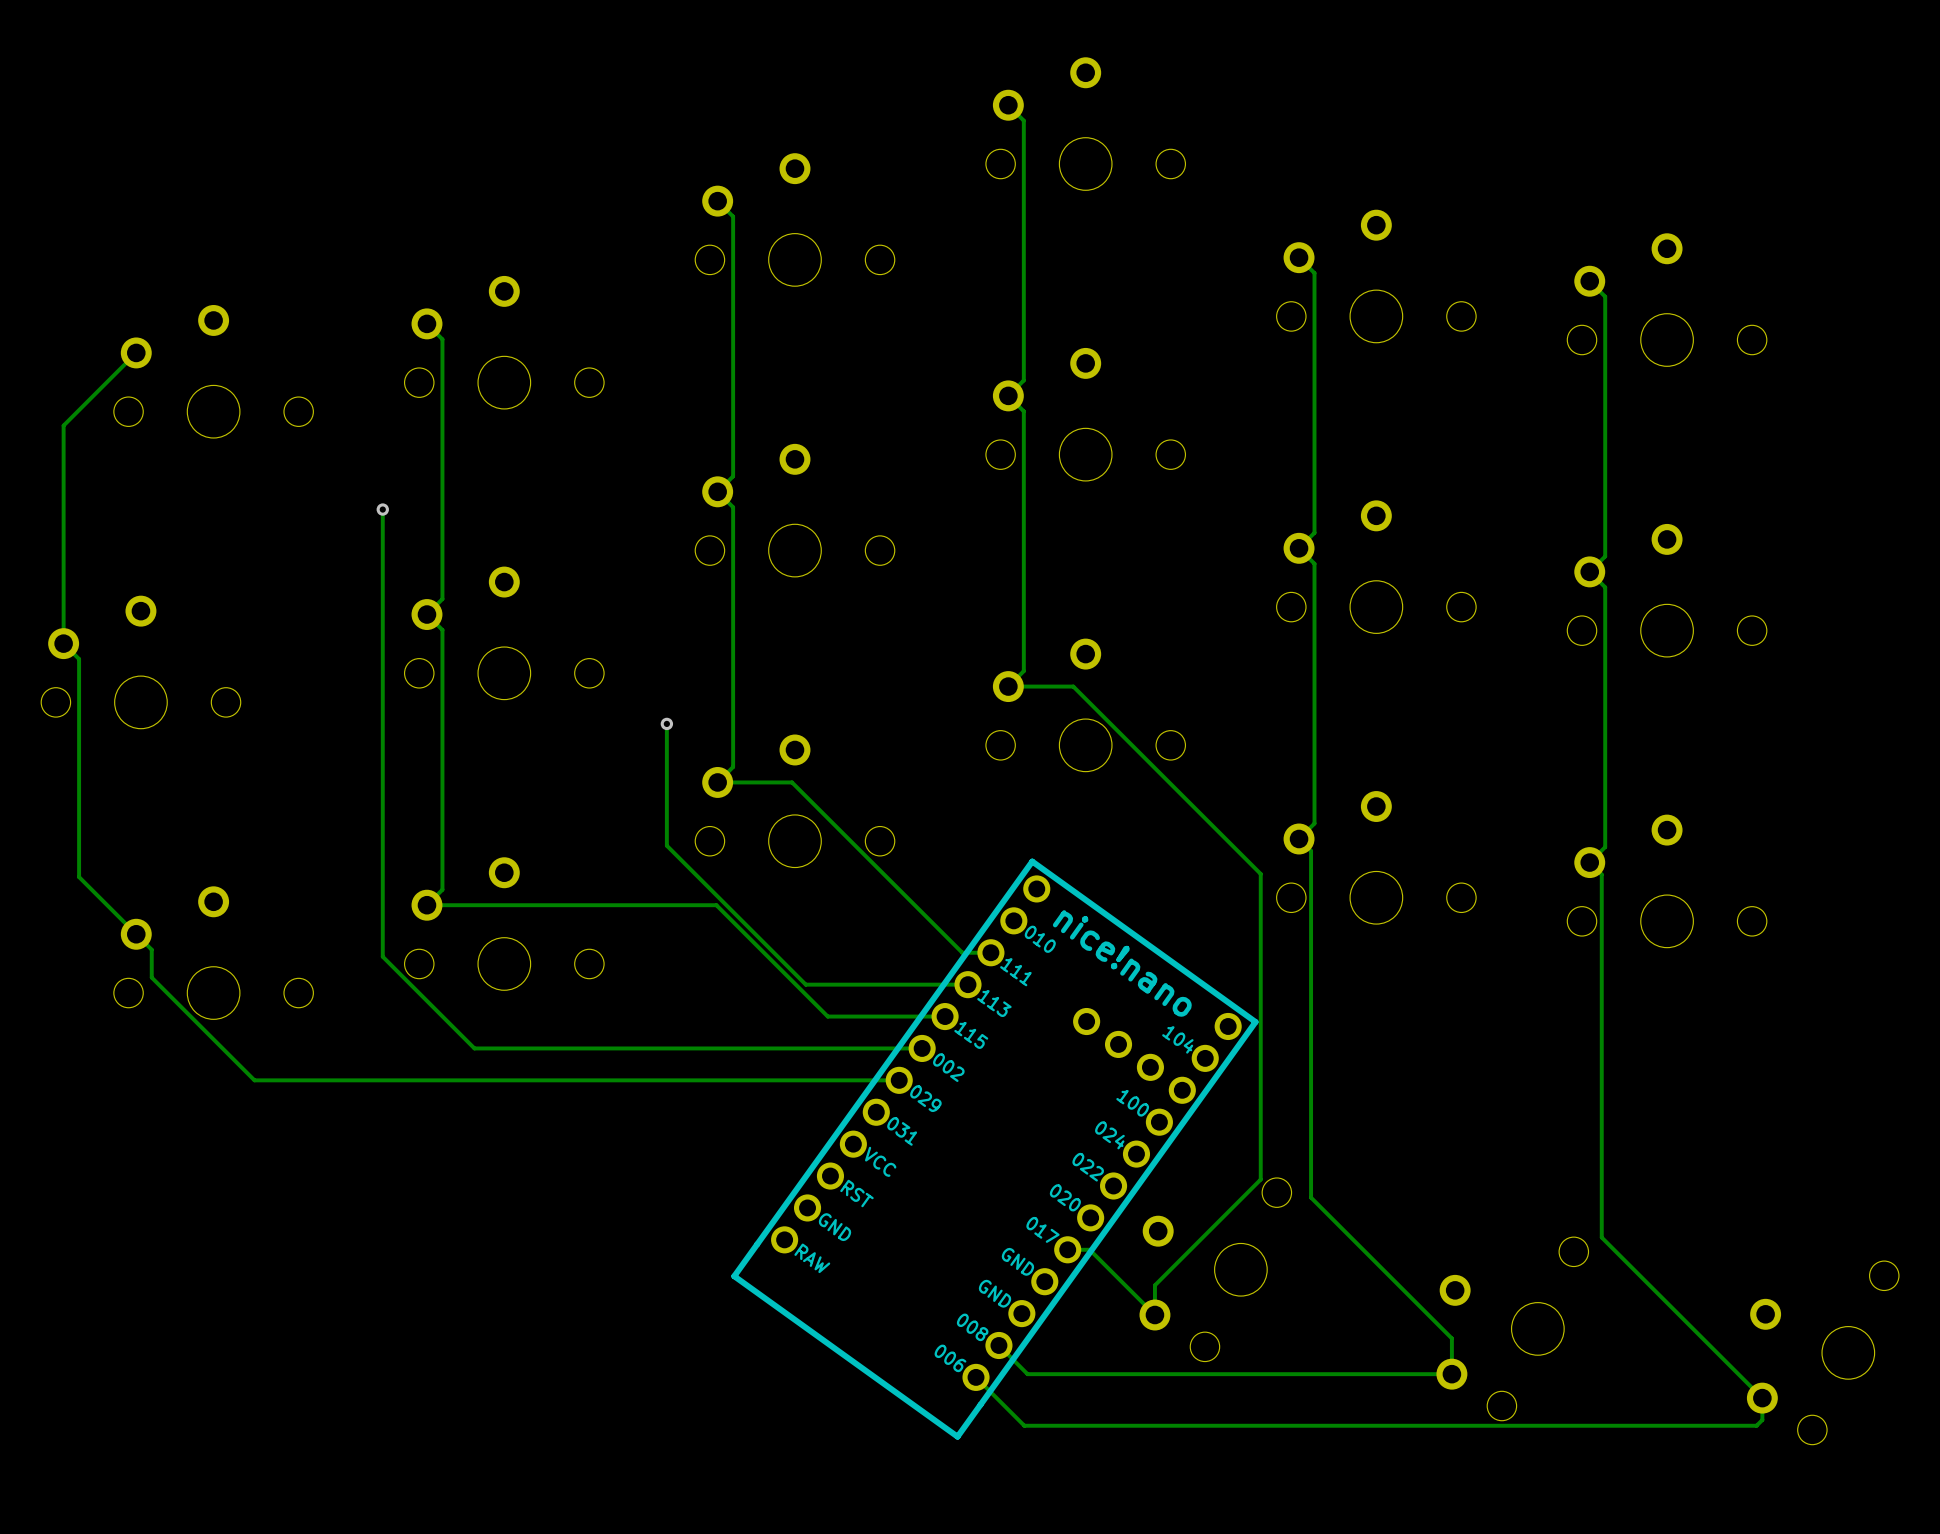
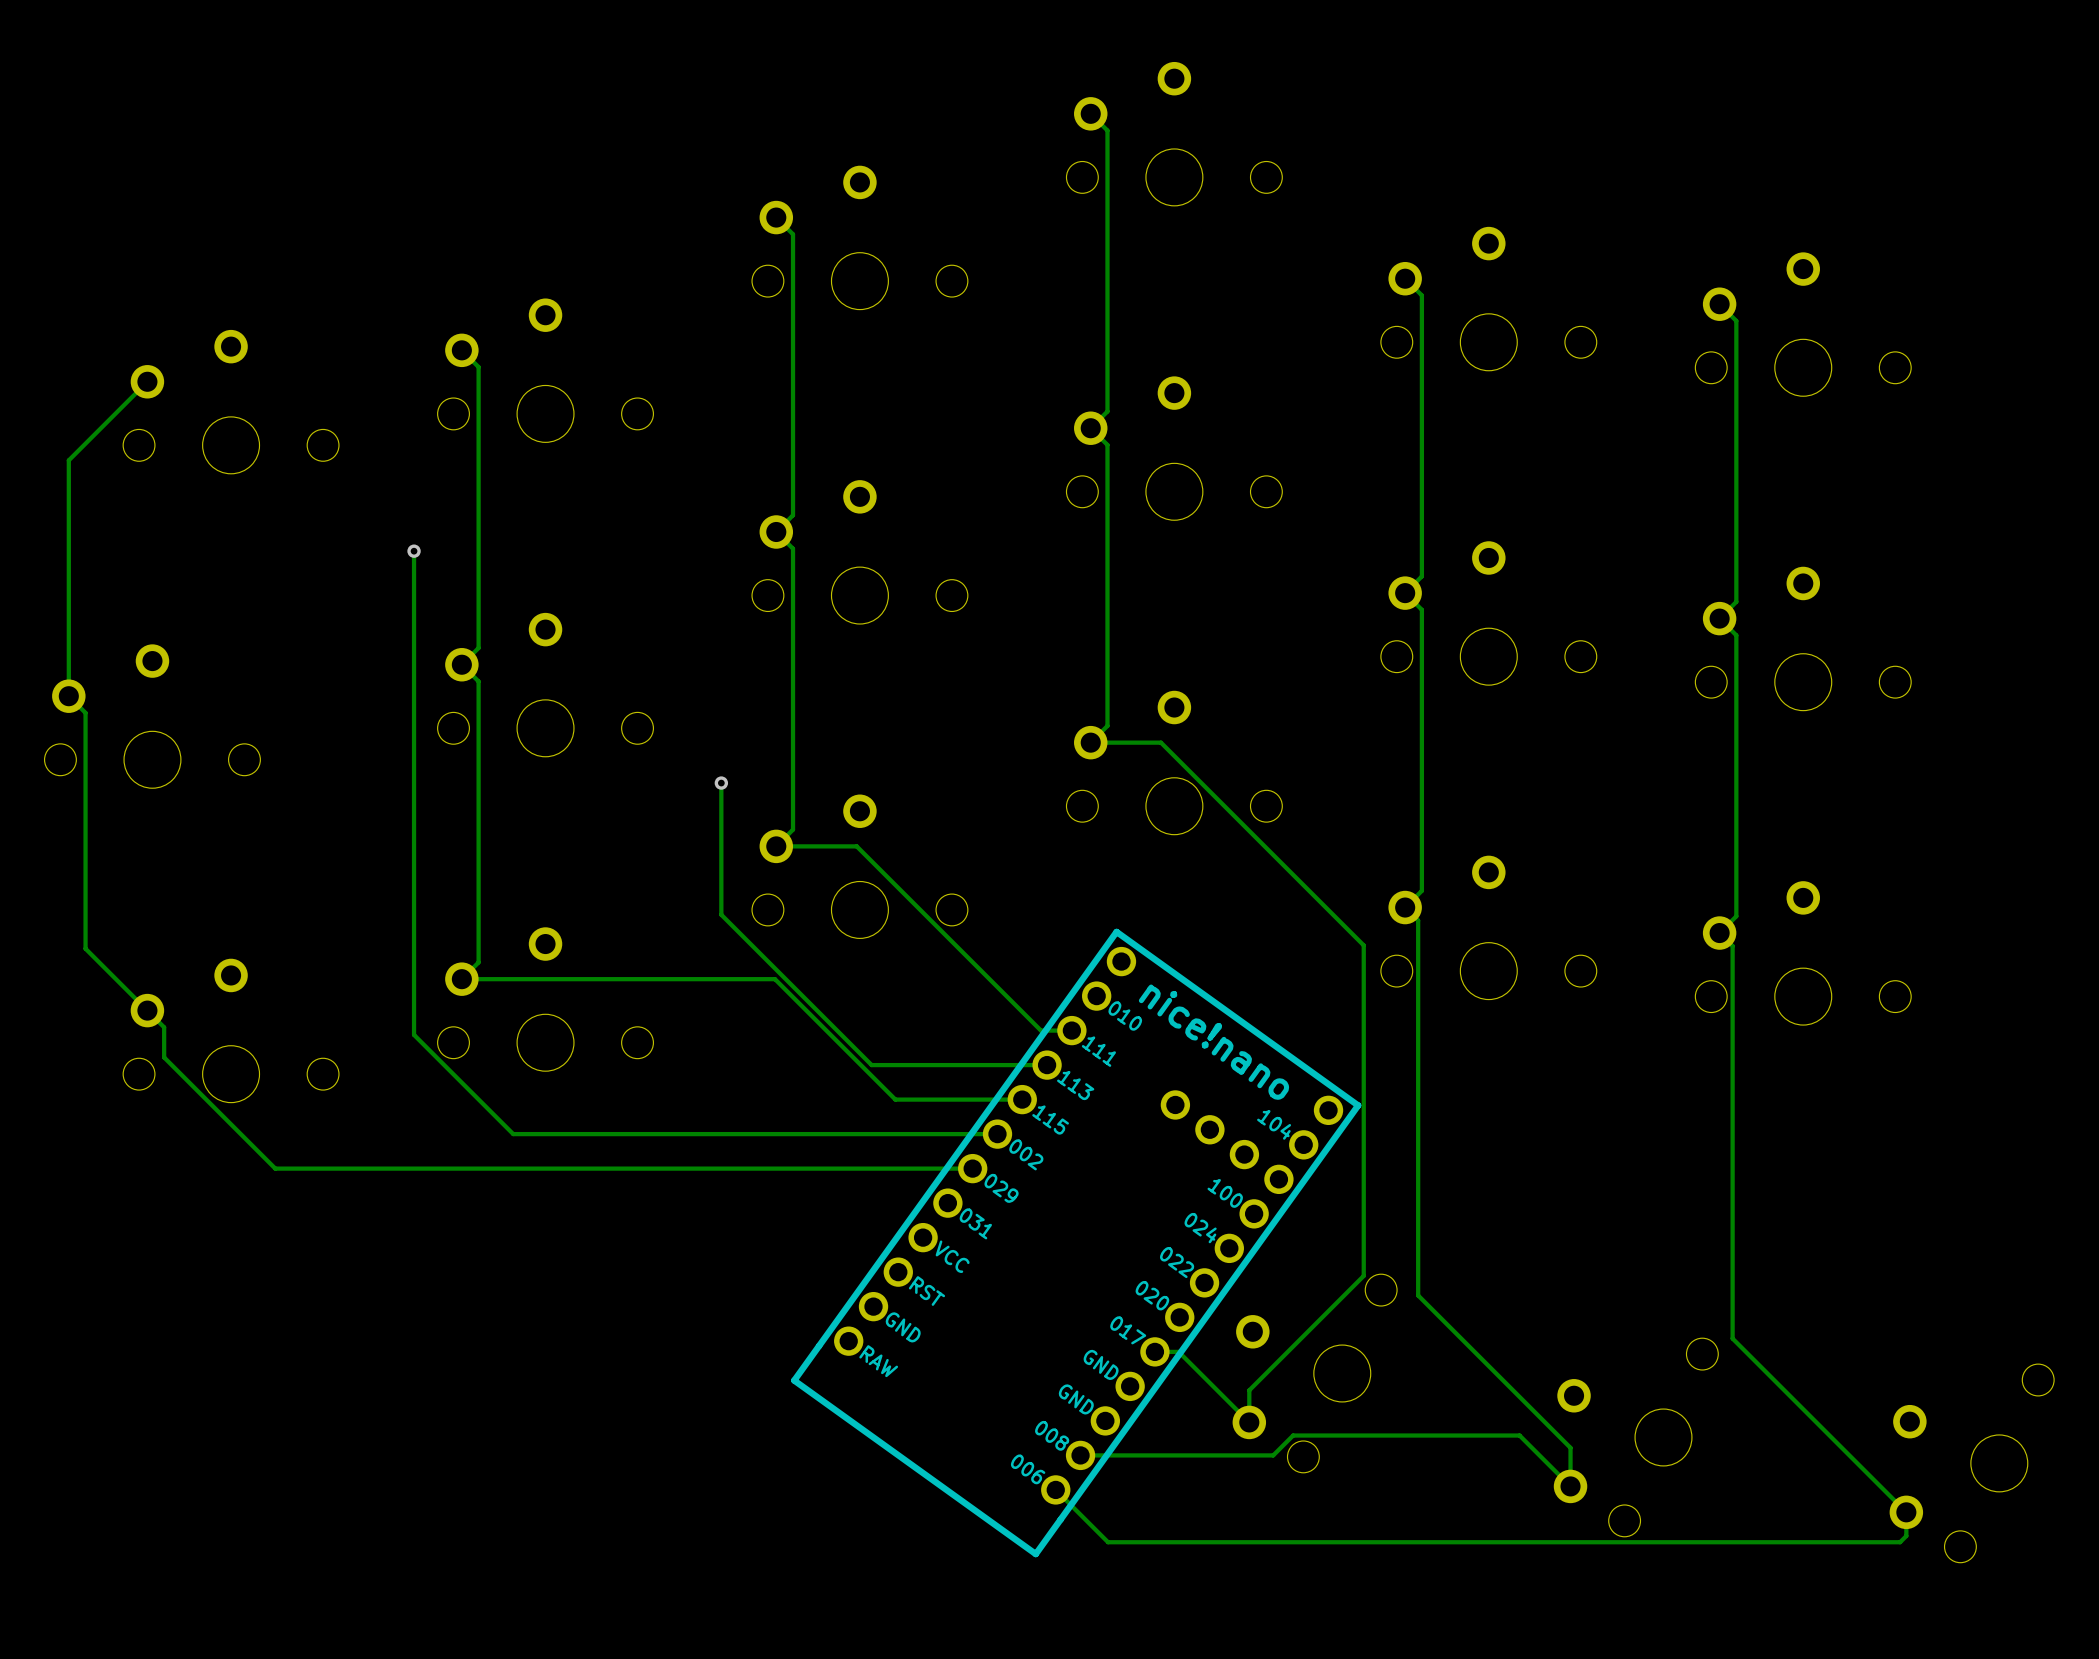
track: (998, 1345) (1027, 1374) (1451, 1374) -> (1080, 1455) (1273, 1455) (1293, 1435) (1519, 1435) (1570, 1486)

